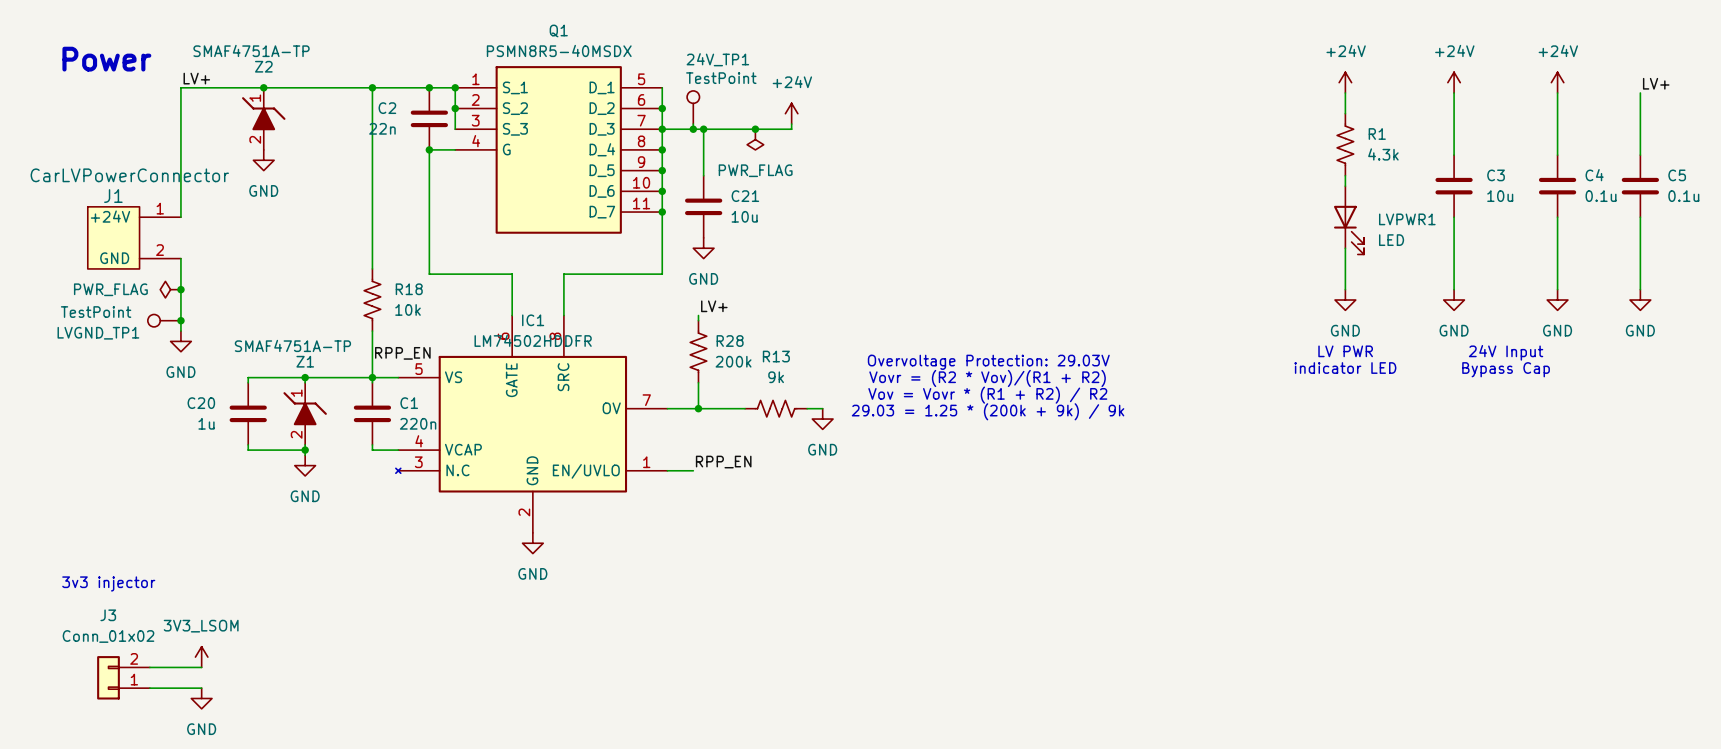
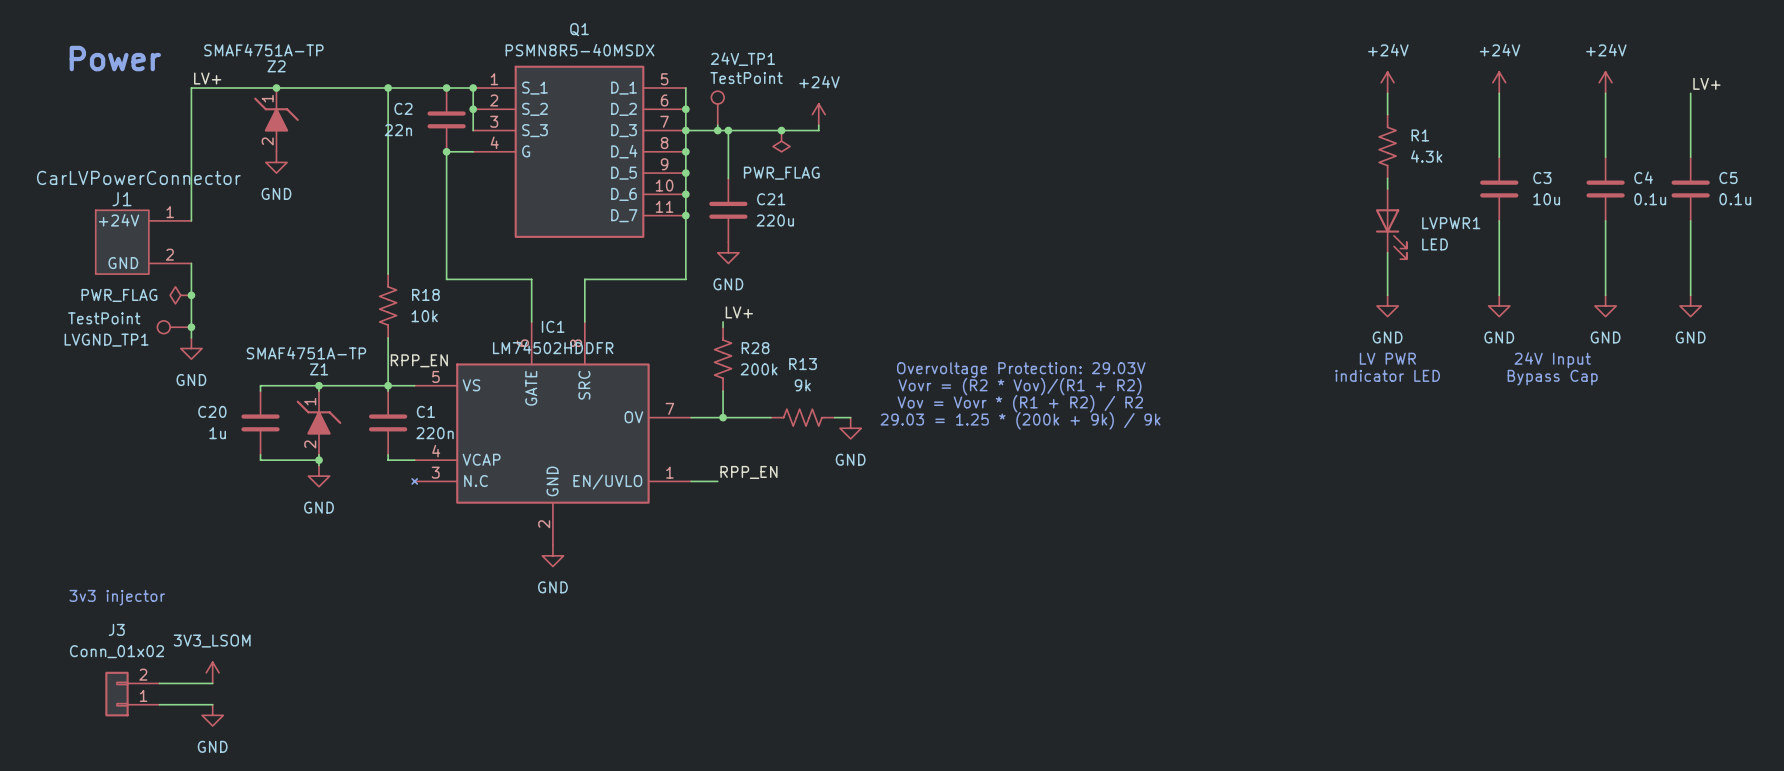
C21 value: 10u (744, 216) -> 220u (775, 220)

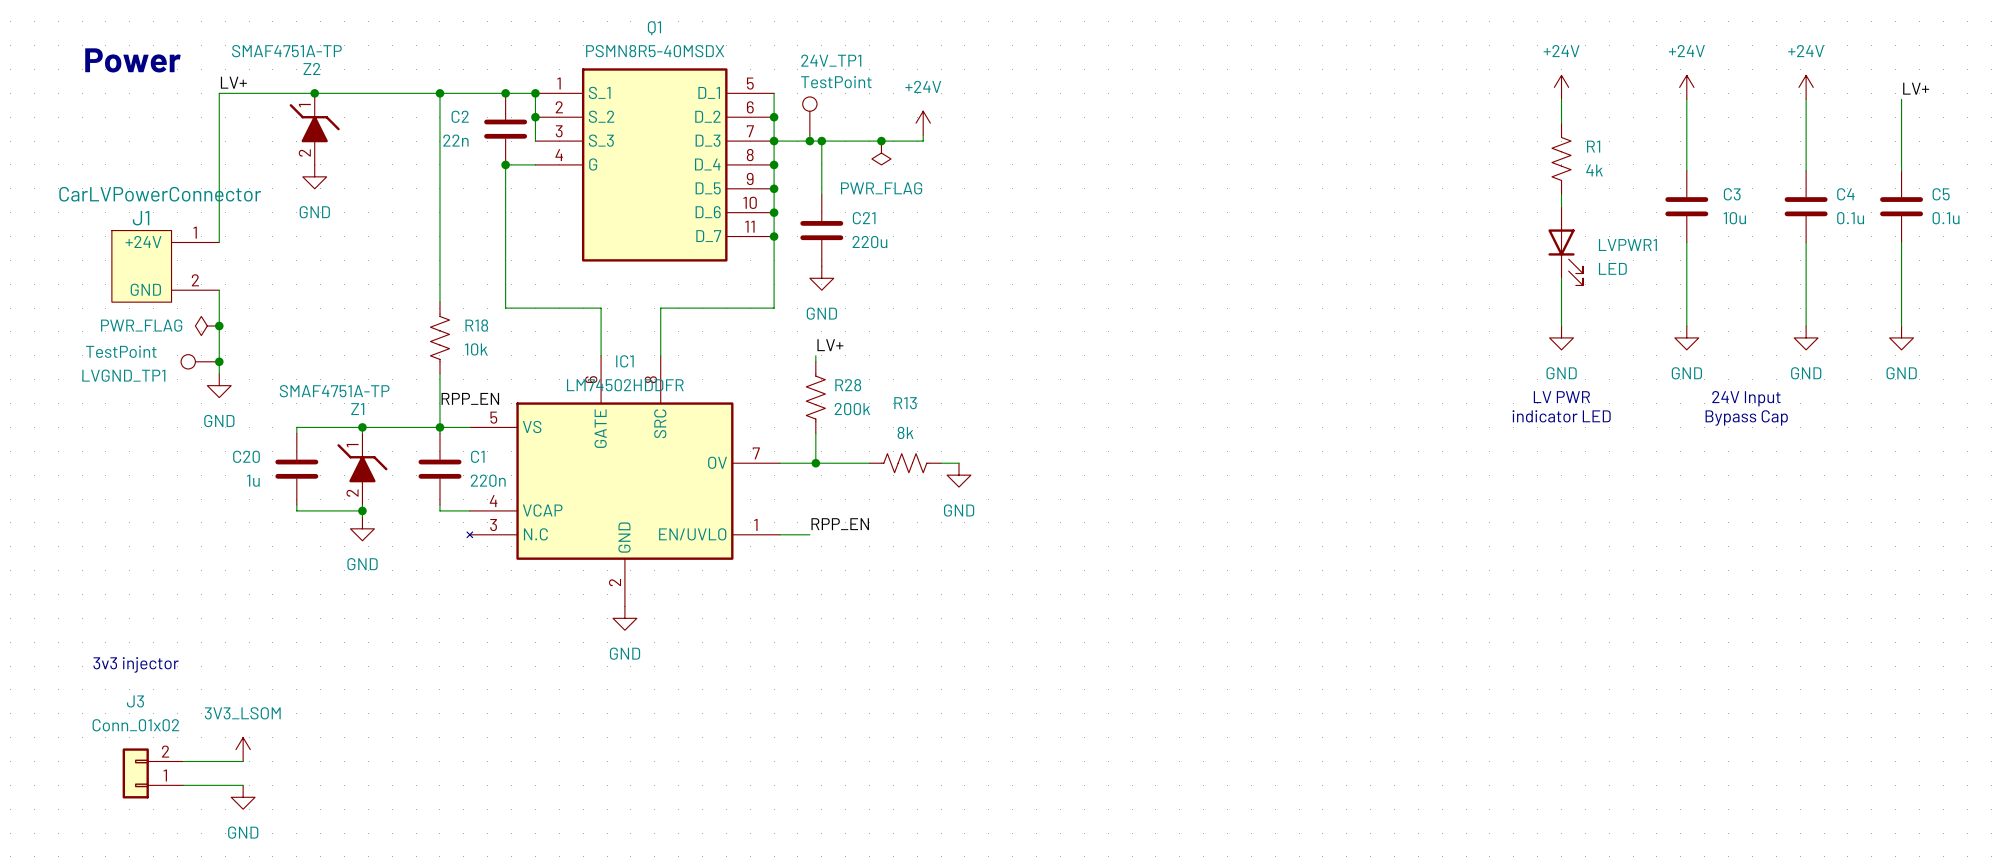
R1 value: 4.3k (1426, 156) -> 4k (1594, 170)
text: Overvoltage Protection: 29.03V (1021, 369) -> none
R13 value: 9k (802, 385) -> 8k (905, 432)
text: Vovr = (R2 * Vov)/(R1 + R2) (1020, 386) -> none
text: Vov = Vovr * (R1 + R2) / R2 (1020, 403) -> none
text: 29.03 = 1.25 * (200k + 9k) / 9k (1020, 420) -> none

